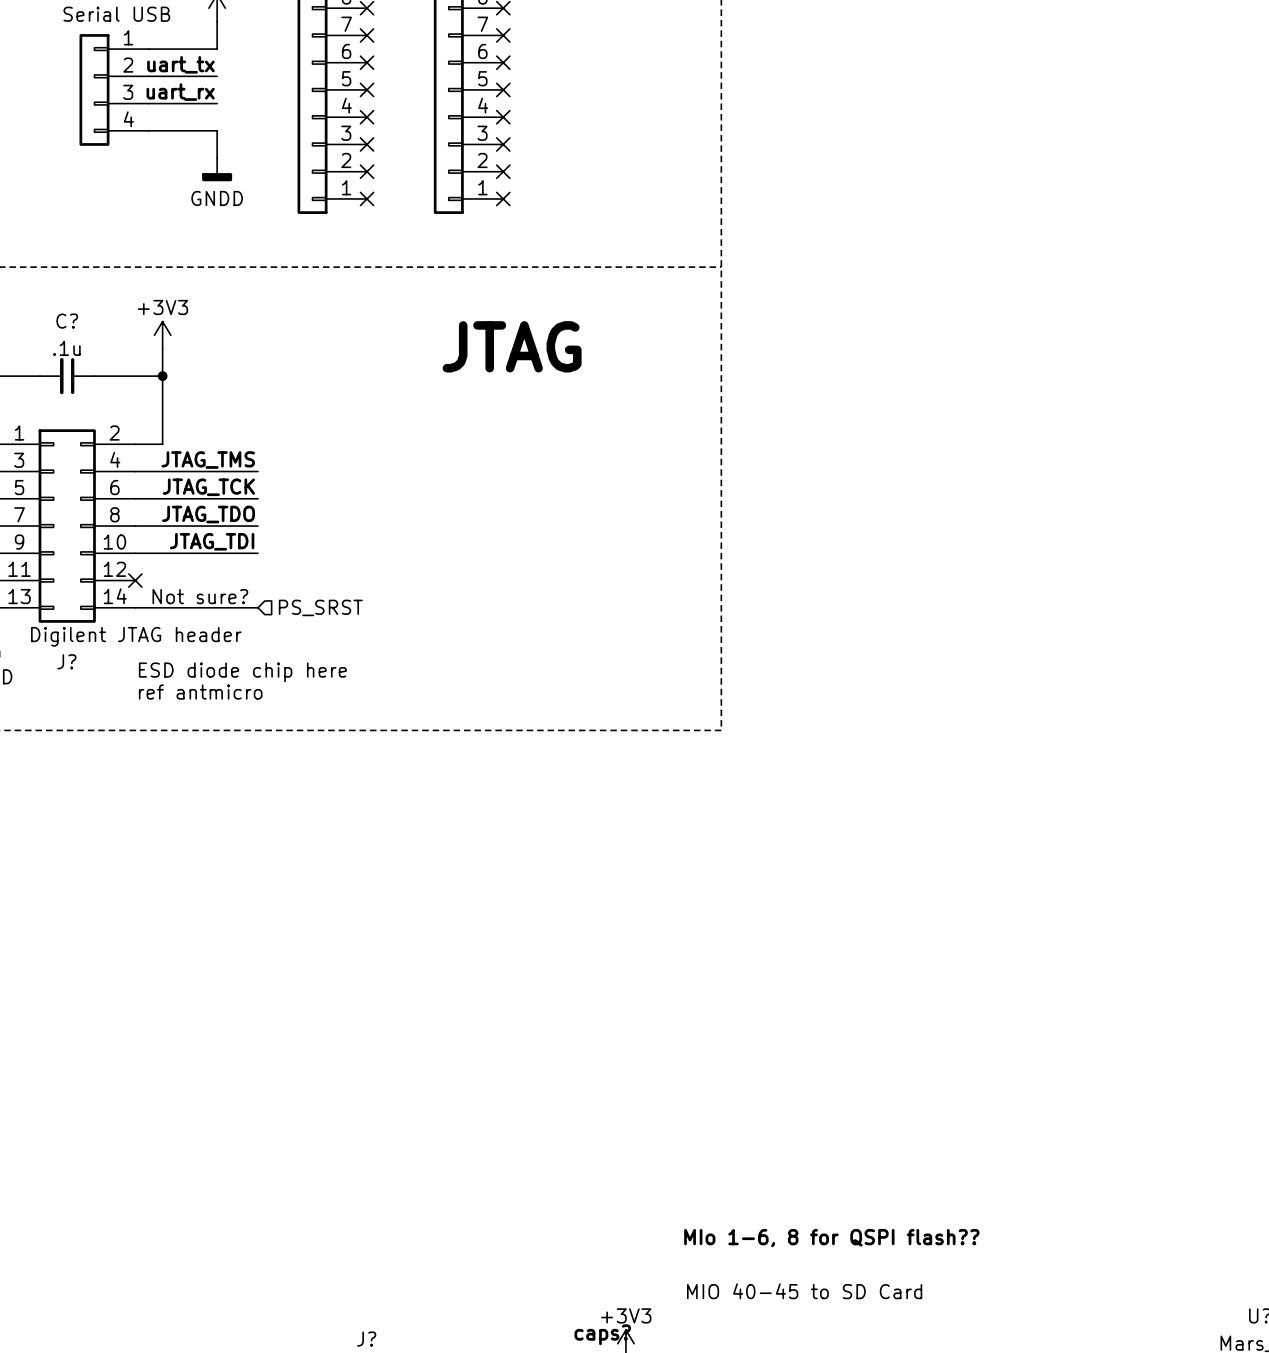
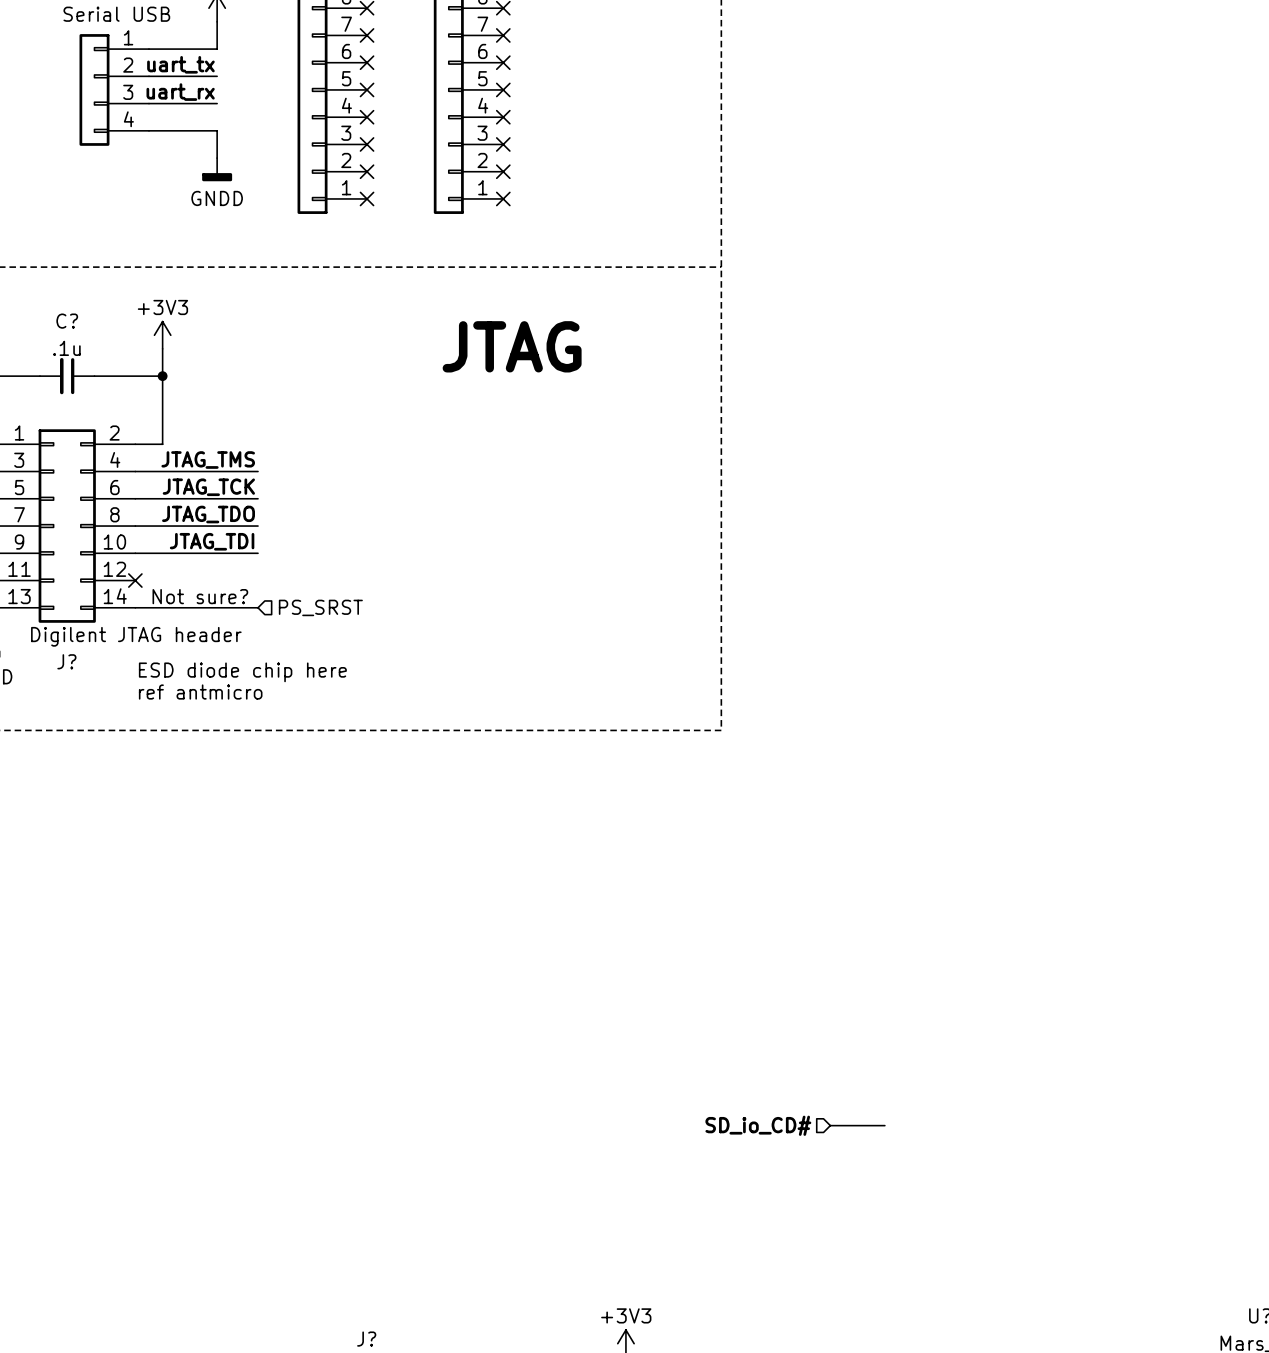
hierarchical label: none -> SD_io_CD# (758, 1125)
wire: none -> (830, 1125) (884, 1125)
text: MIo 1-6, 8 for QSPI flash?? (831, 1238) -> none
text: MIO 40-45 to SD Card (804, 1291) -> none
text: caps? (602, 1334) -> none

